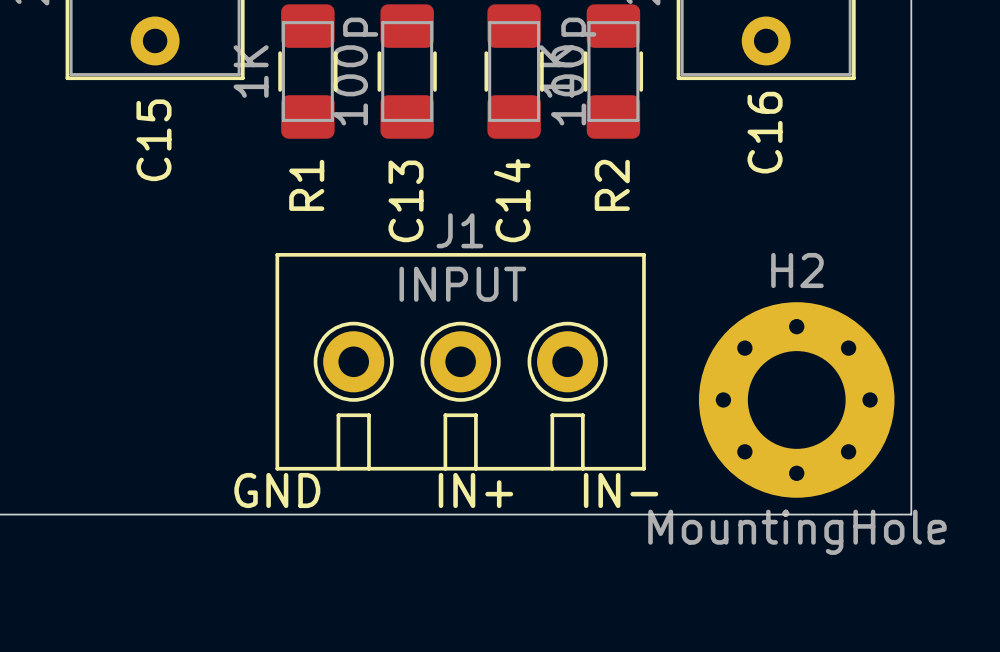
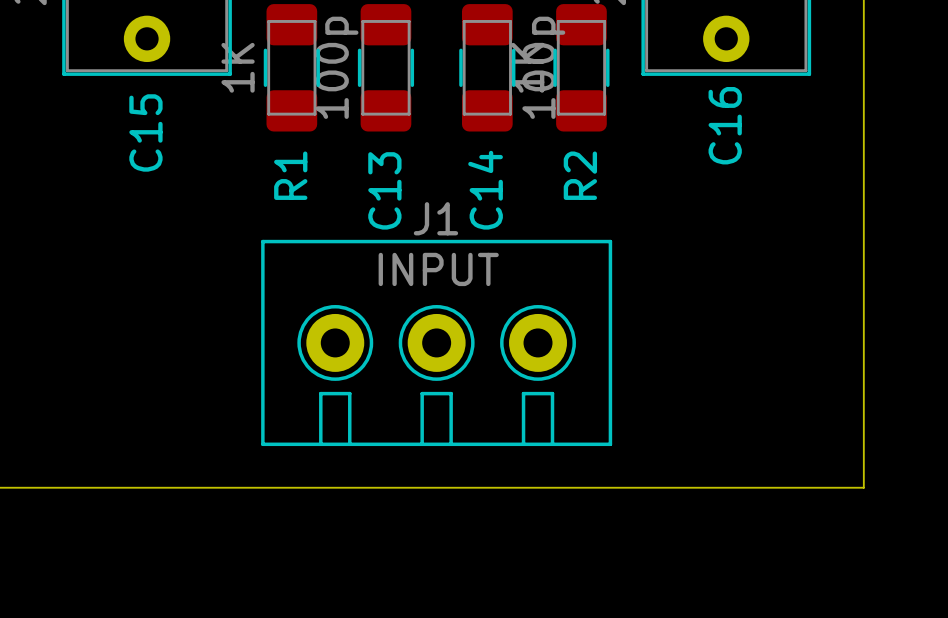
H2: MountingHole (796, 399) -> none
text: GND (277, 490) -> none
text: IN+ (475, 490) -> none
text: IN- (621, 490) -> none

